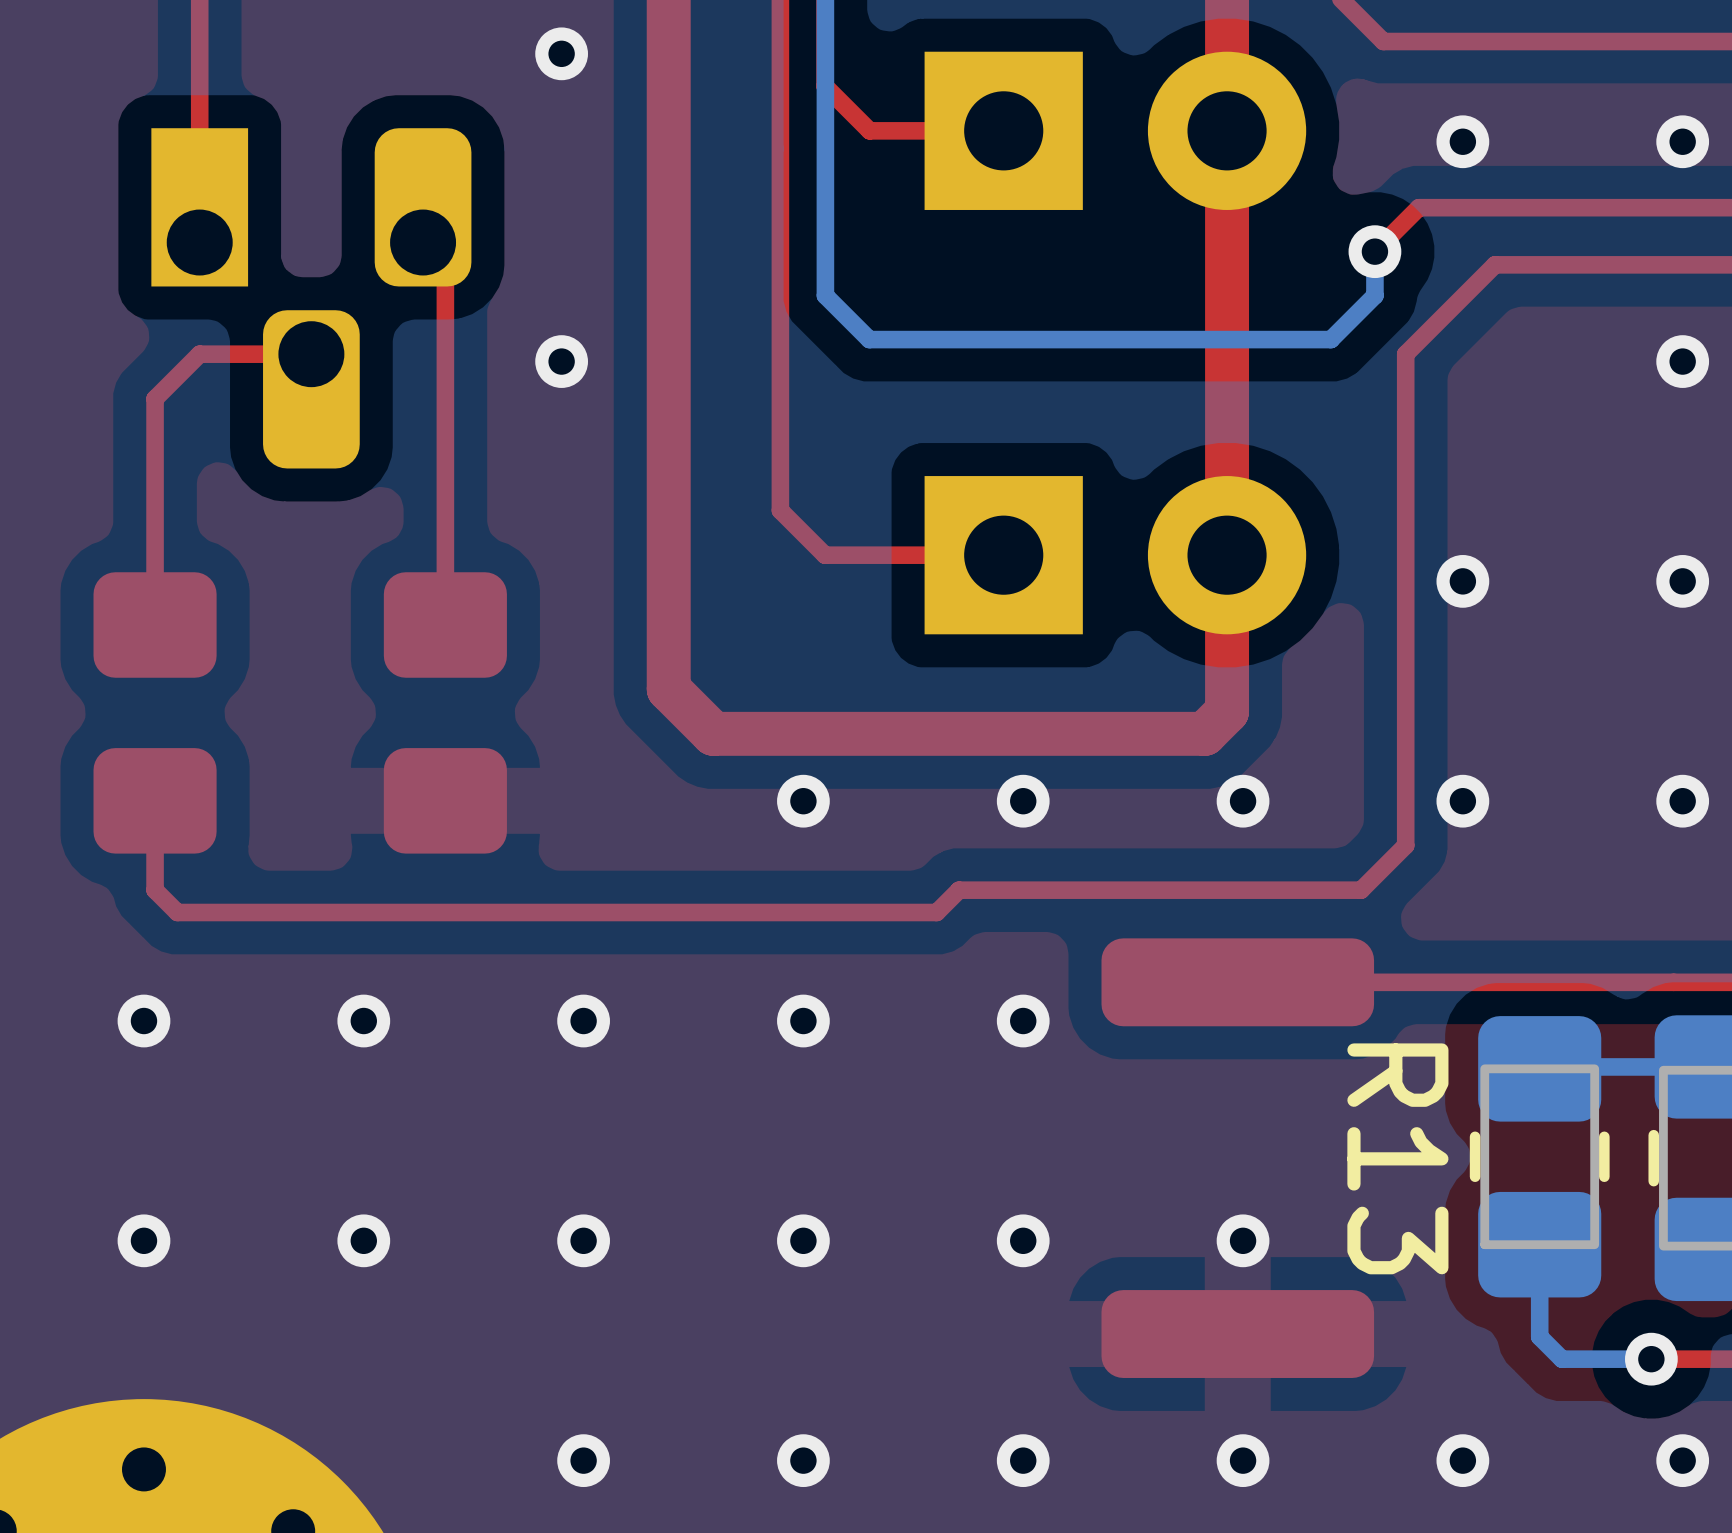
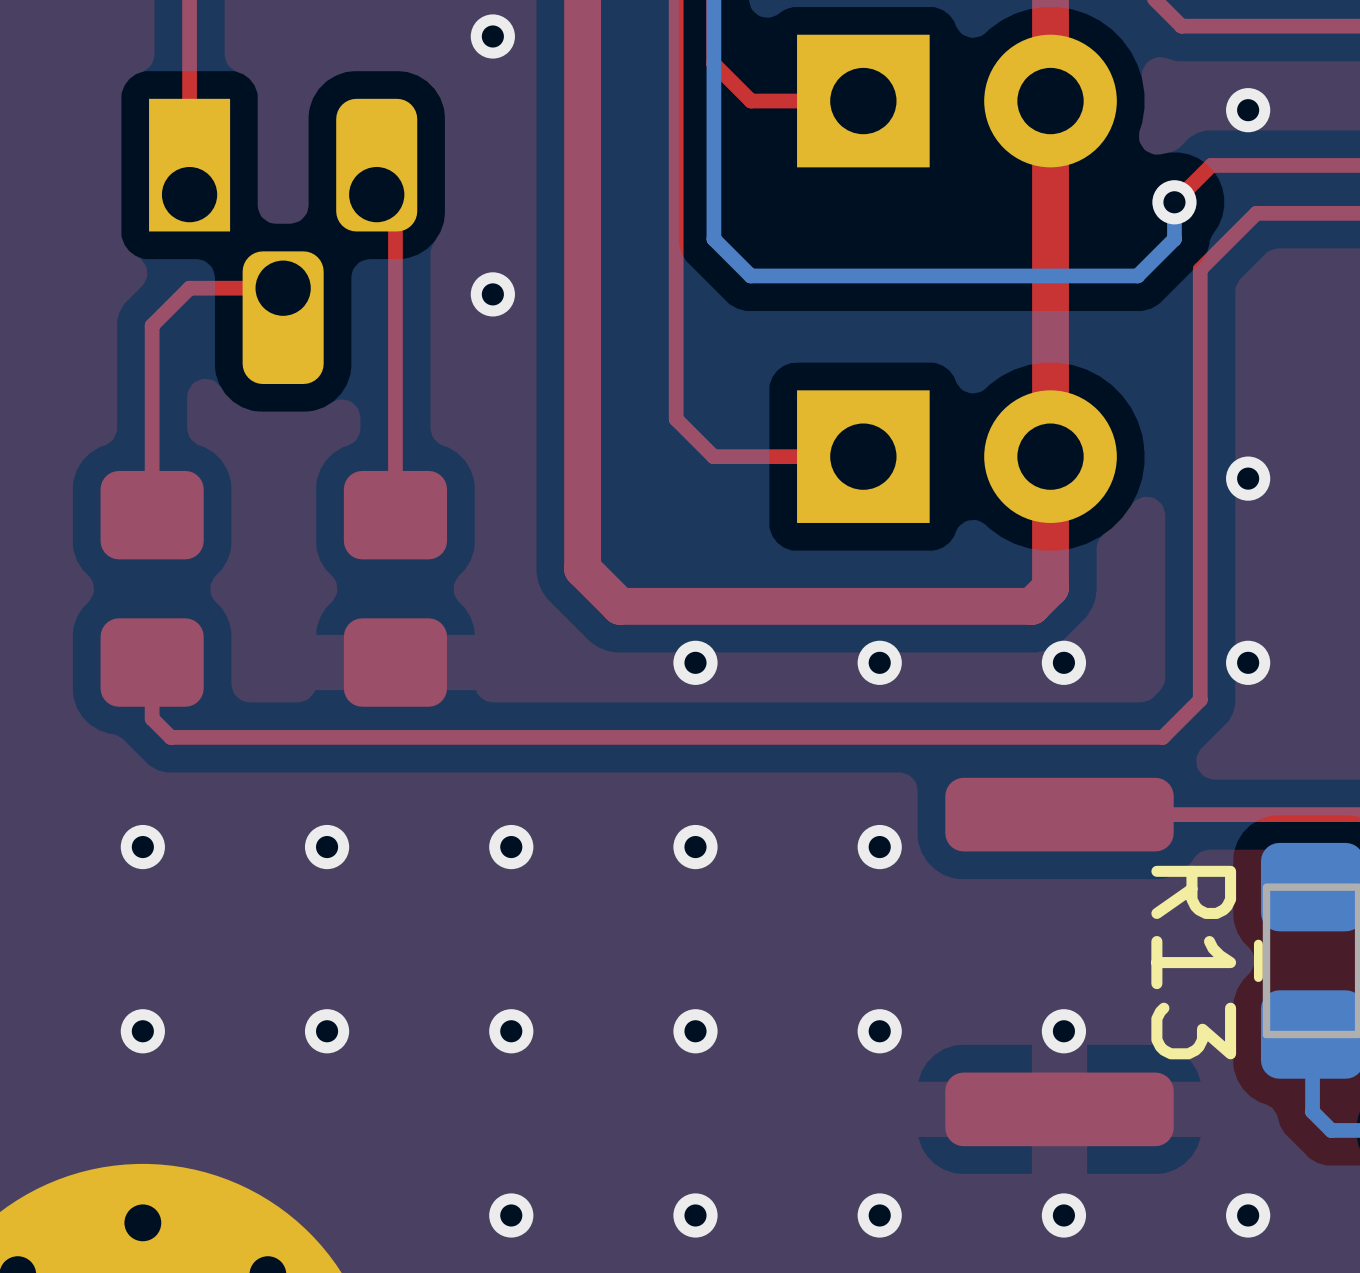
top track: (1495, 264) (1405, 354) -> (1275, 213) (1256, 213) (1200, 269) (1200, 288)
top track: (155, 867) (155, 890) (177, 912) (936, 912) (959, 890) -> (152, 718) (170, 737) (825, 737)

